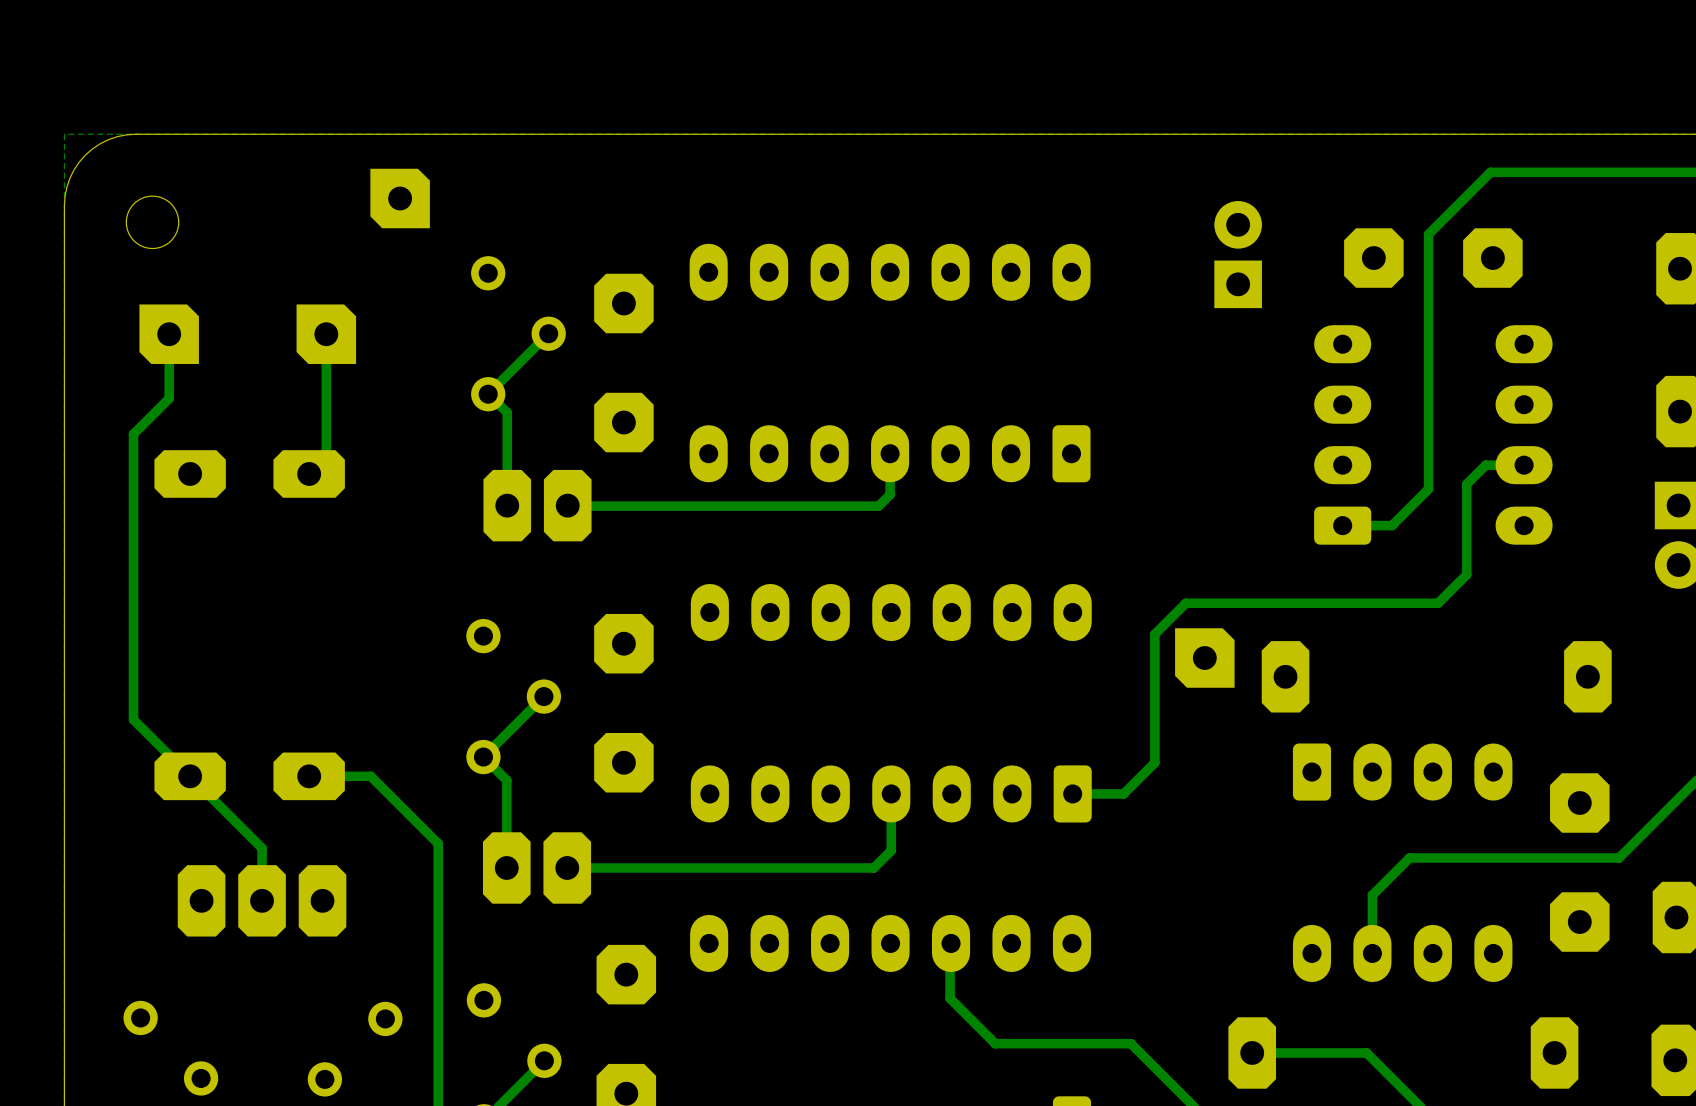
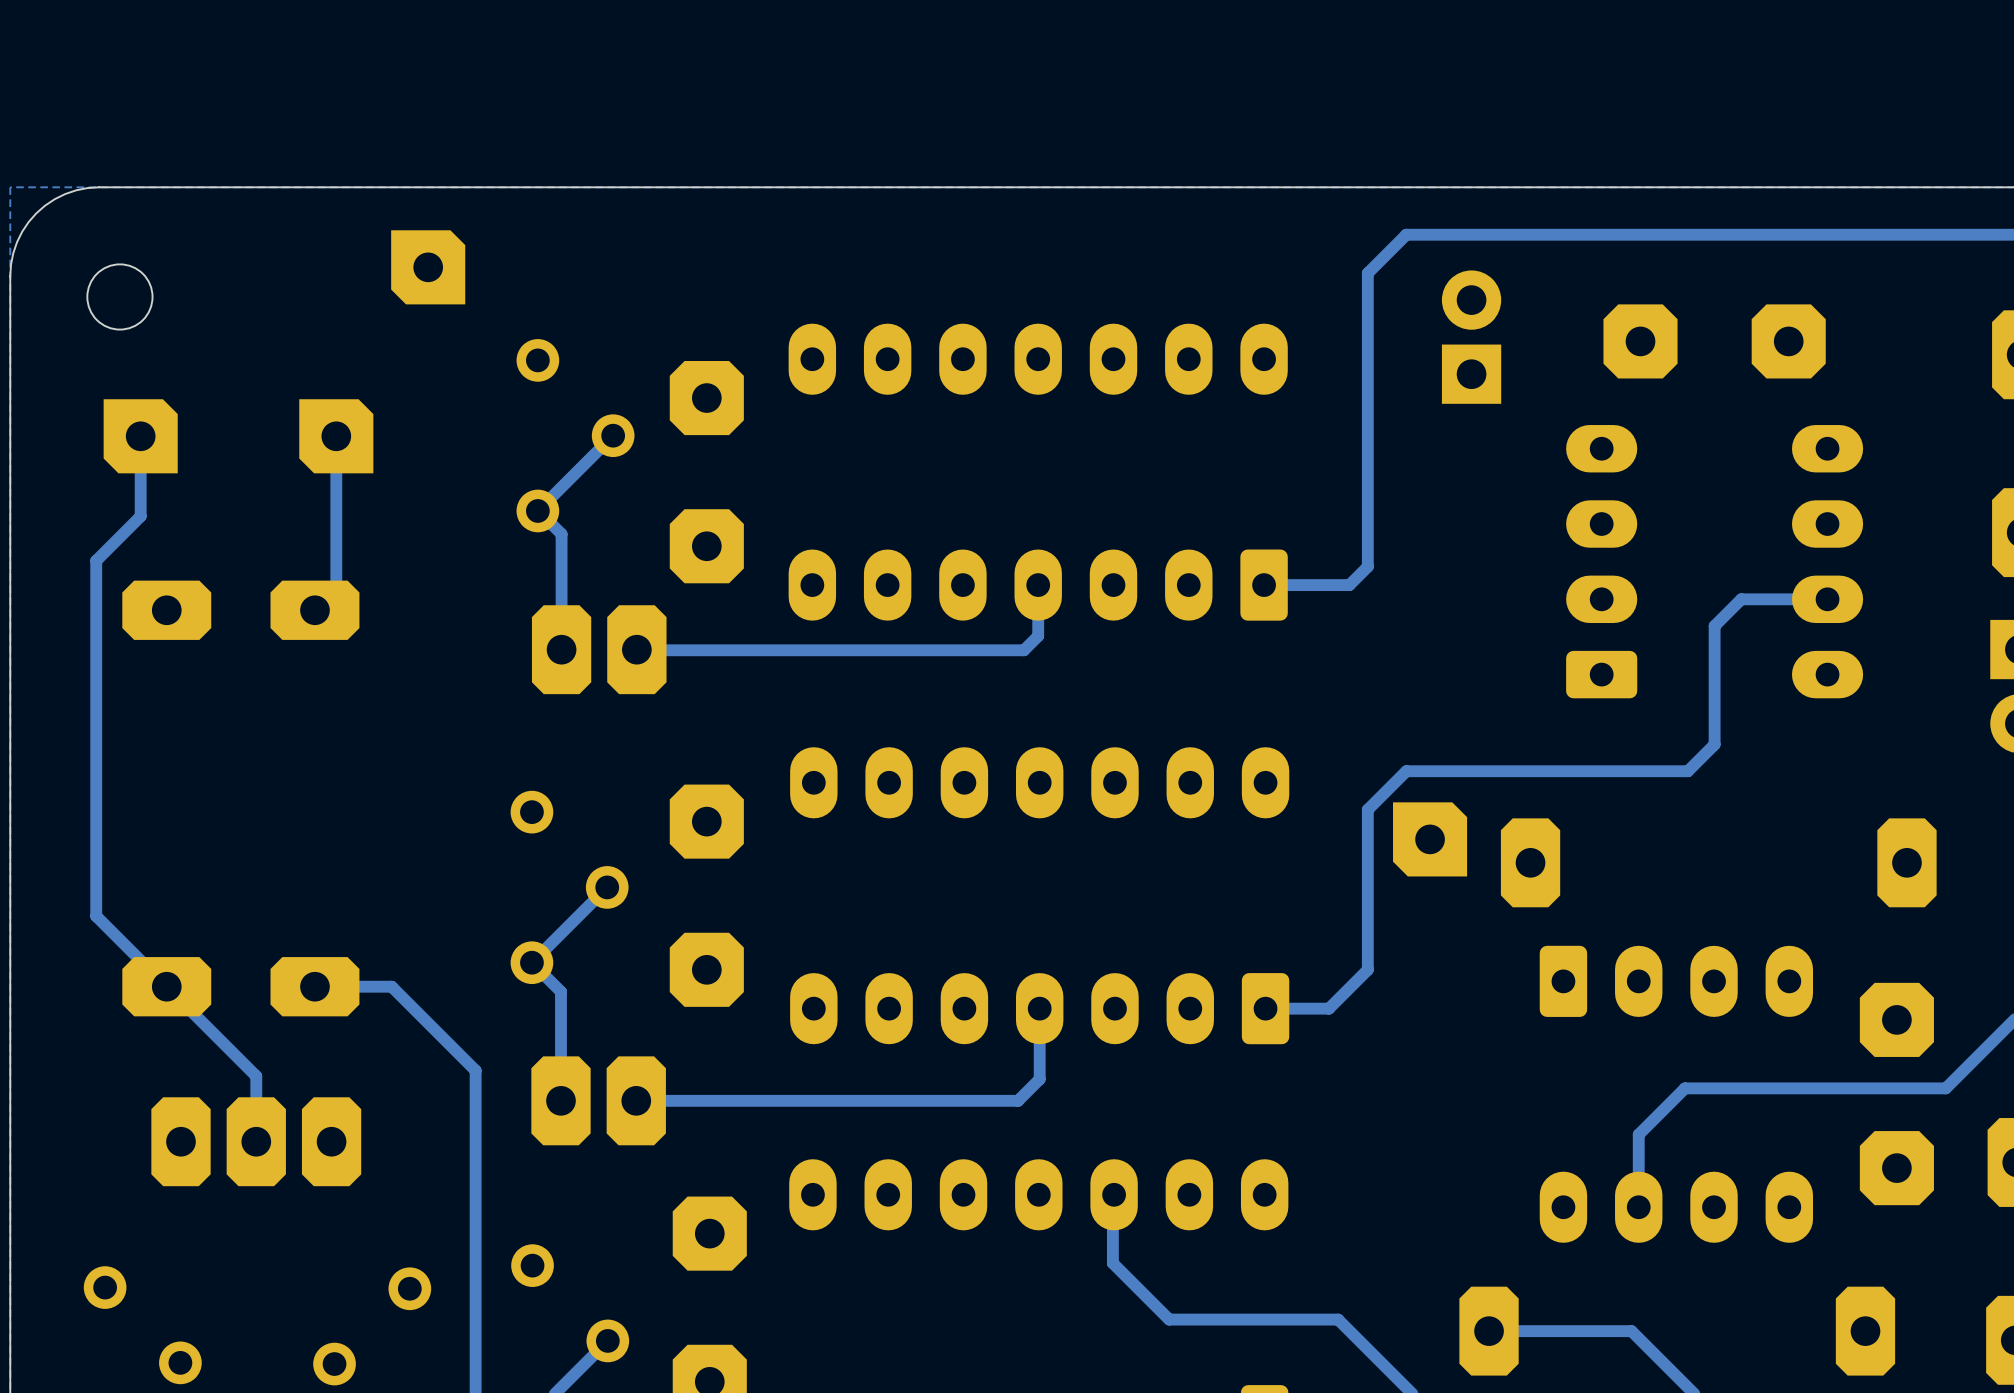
track: (1490, 172) (1428, 234) (1428, 488) (1391, 525) (1342, 525) -> (1785, 234) (1406, 234) (1367, 273) (1367, 566) (1349, 585) (1264, 585)
track: (1485, 465) (1466, 484) (1466, 574) (1438, 603) (1411, 603) -> (1779, 599) (1741, 599) (1714, 625) (1714, 744) (1687, 771)

